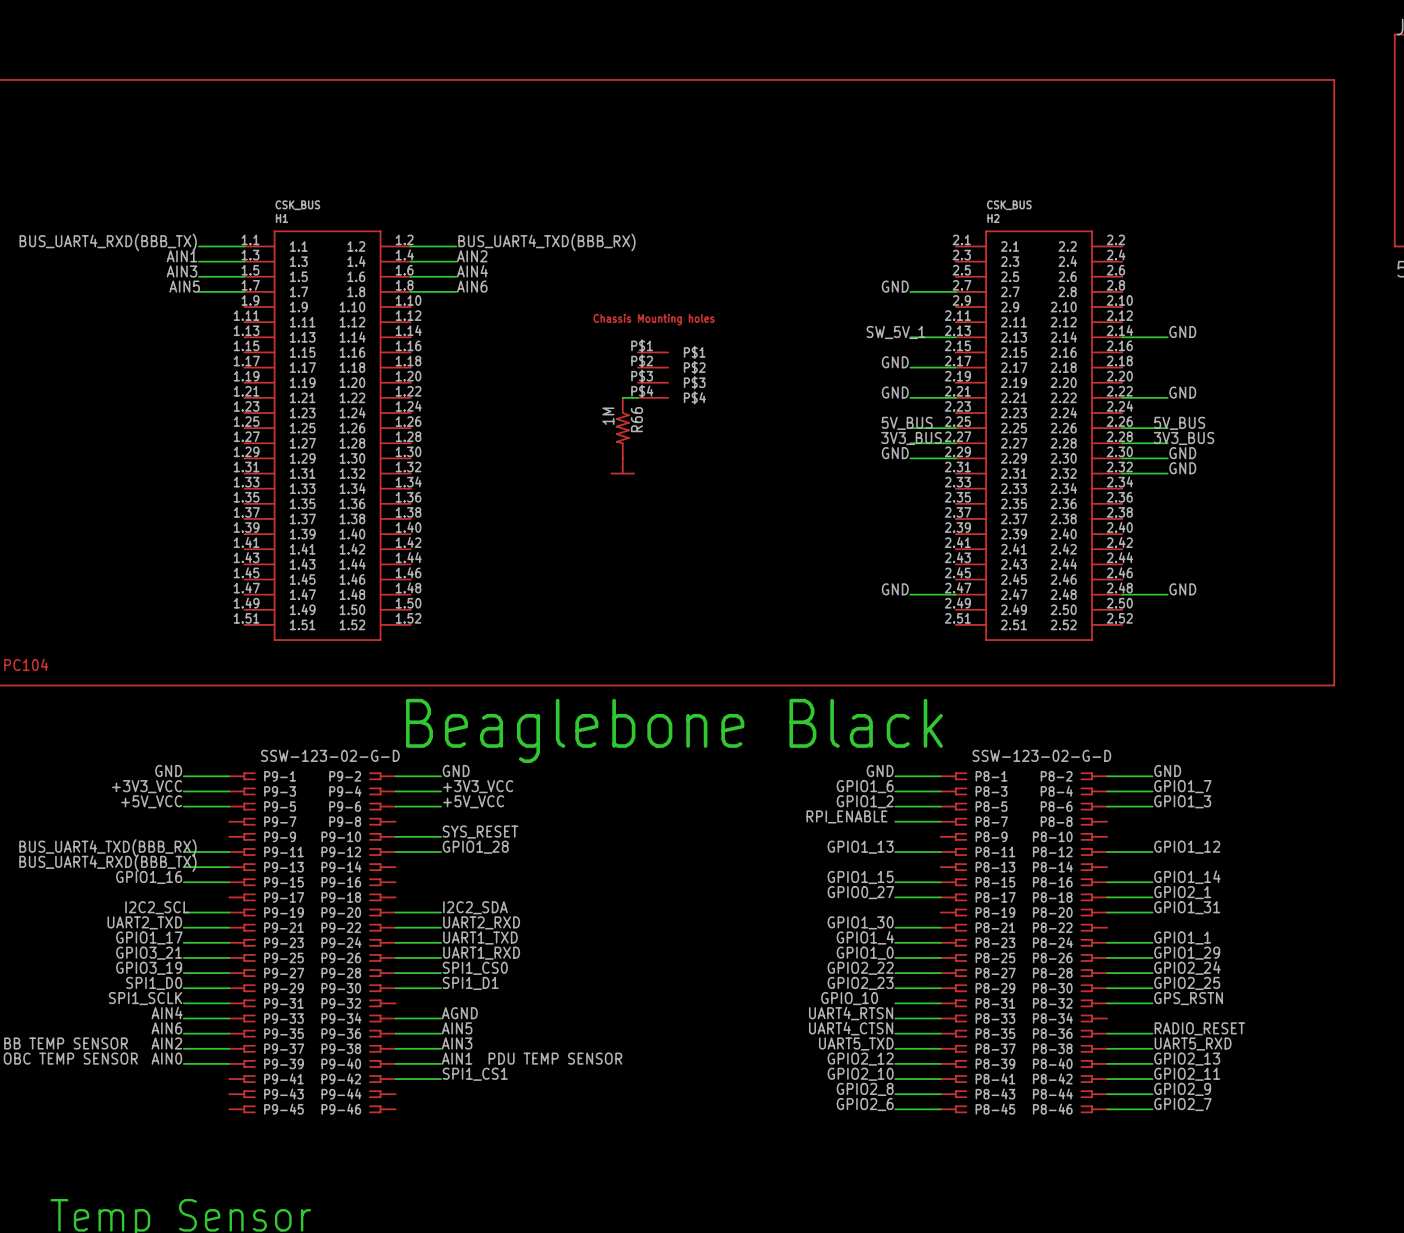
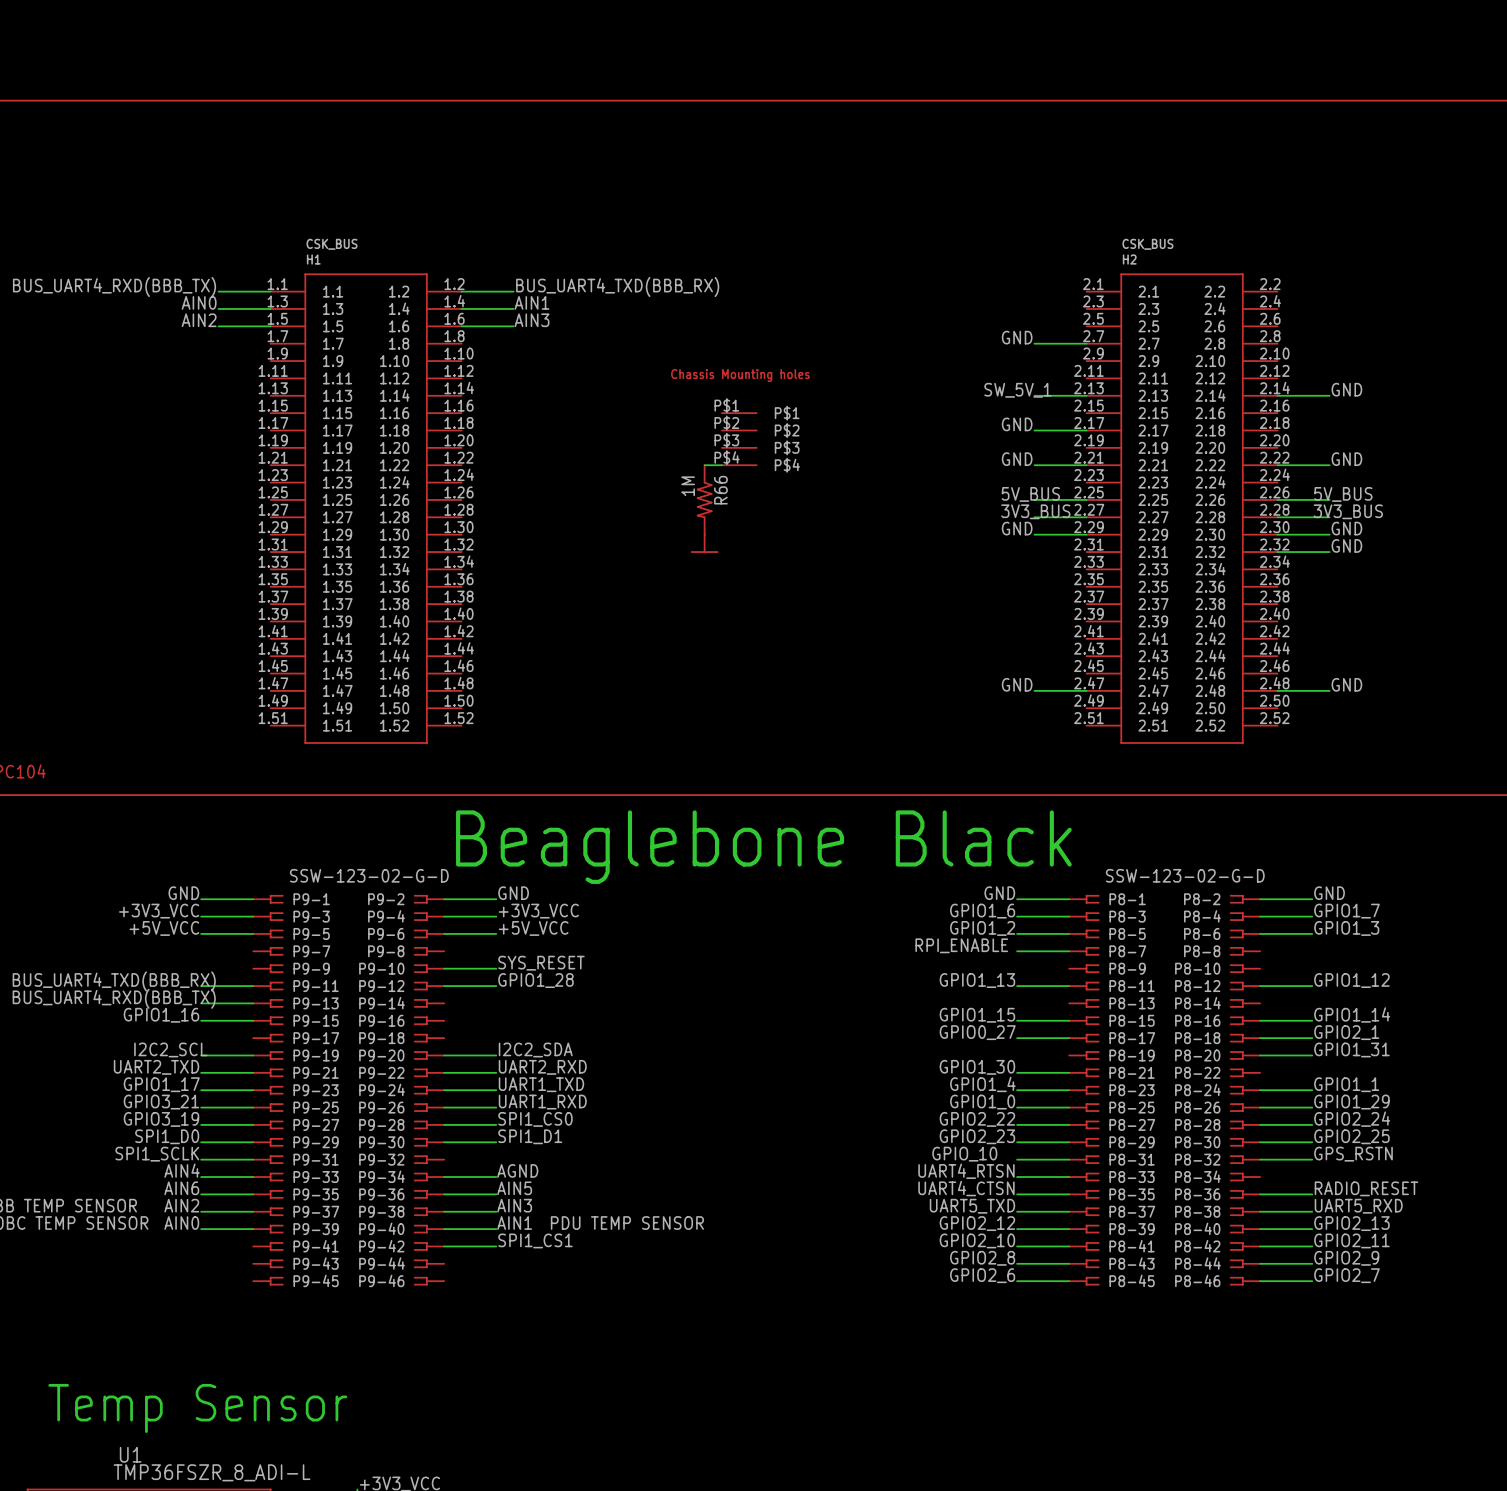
label: AIN1 (181, 256) -> AIN0 (199, 302)
label: AIN2 (472, 256) -> AIN1 (532, 302)
label: AIN3 (181, 271) -> AIN2 (199, 320)
label: AIN4 (472, 271) -> AIN3 (532, 320)
label: AIN5 (184, 286) -> none
label: AIN6 (472, 286) -> none
wire: (198, 291) (244, 291) -> none
wire: (410, 291) (456, 291) -> none

